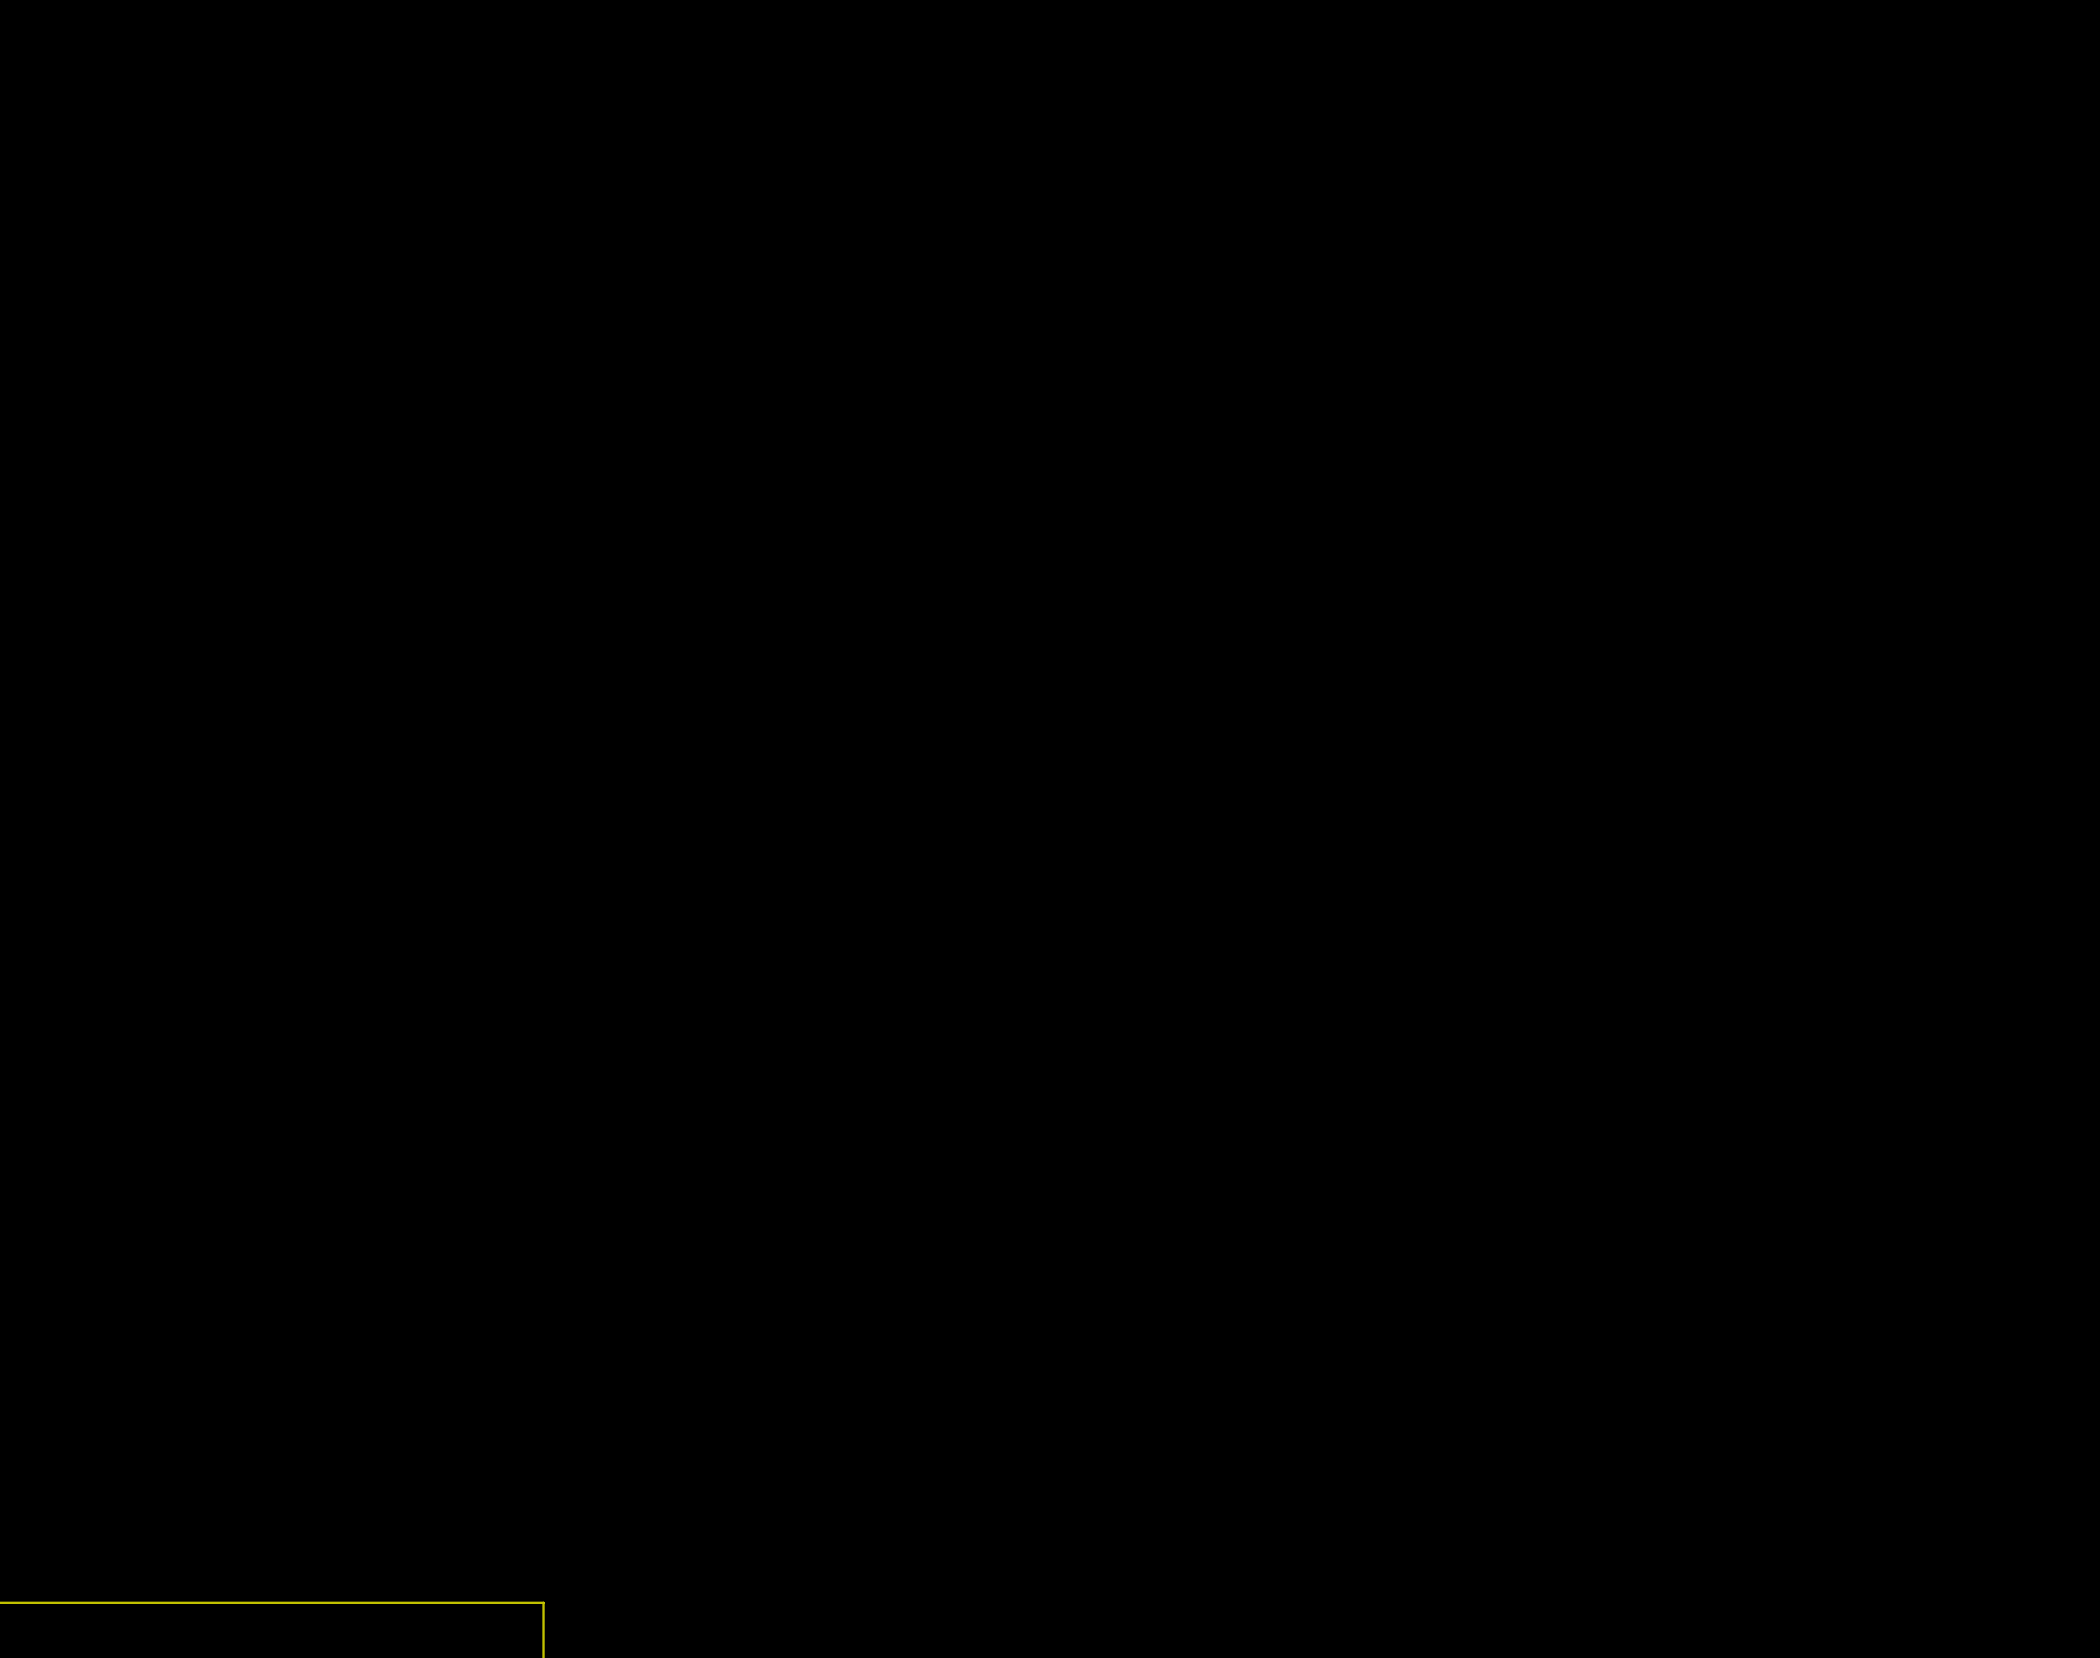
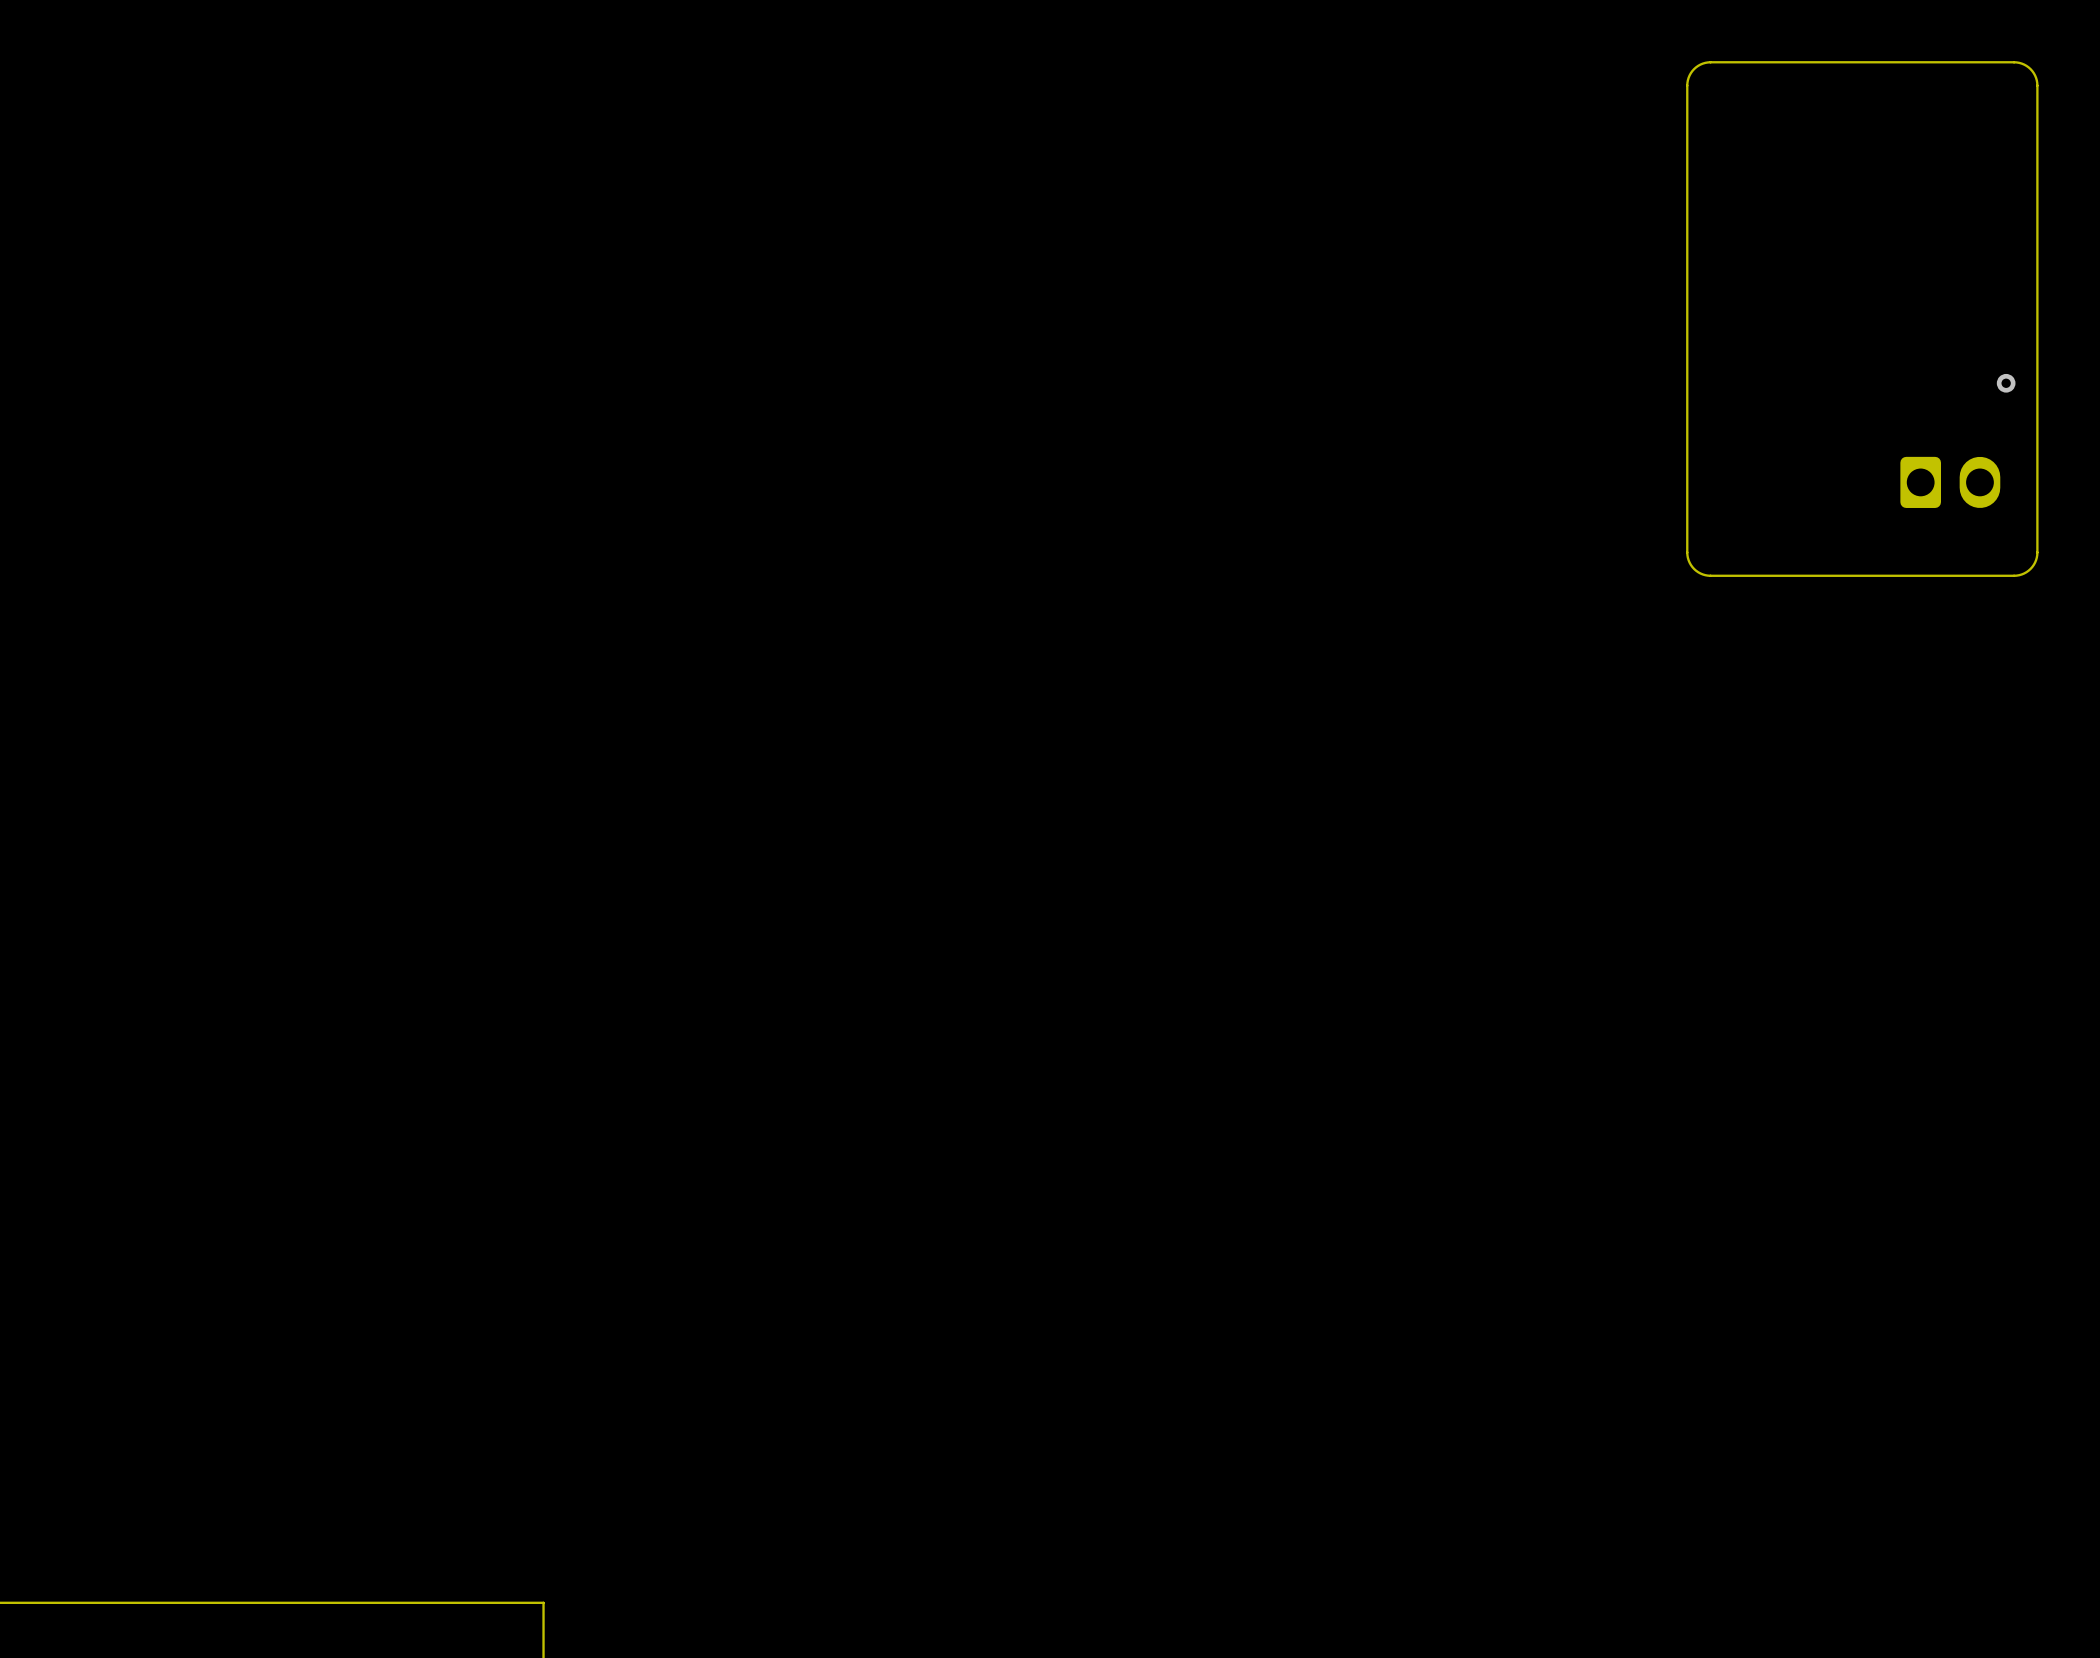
board edge: none -> (2014, 62) (1710, 62) (1700, 64) (1690, 73) (1687, 85) (1687, 552) (1690, 564) (1698, 572) (1710, 575) (2014, 575) (2026, 572) (2033, 564) (2037, 552) (2037, 85) (2036, 77) (2030, 69) (2021, 63) (2014, 62)
via: none -> (2006, 383)
part: none -> (1950, 482)

